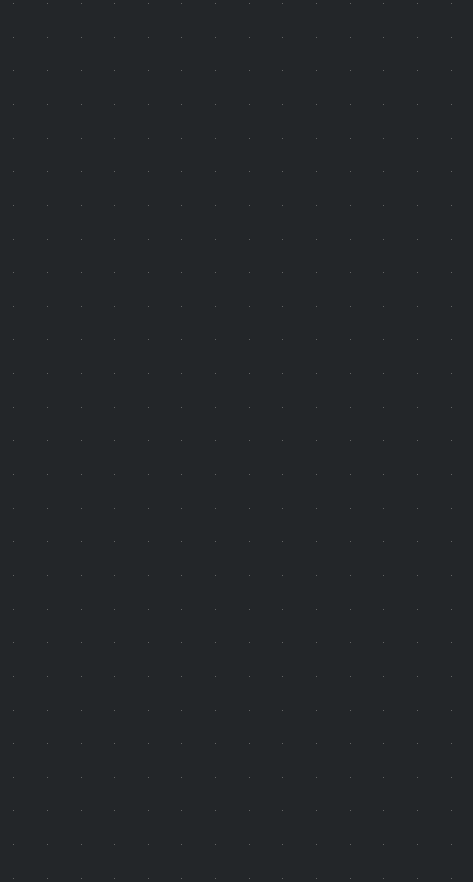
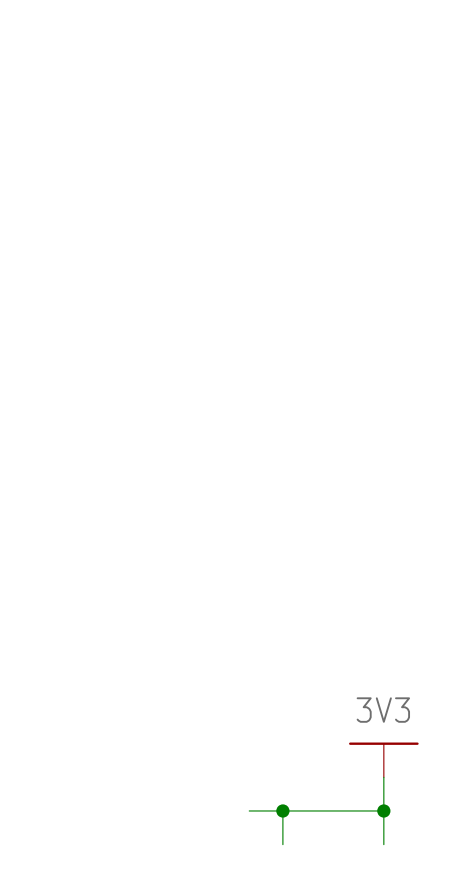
power symbol: none -> 3V3 (383, 759)
wire: none -> (383, 777) (383, 844)
wire: none -> (249, 810) (383, 810)
wire: none -> (282, 810) (282, 844)
junction: none -> (282, 810)
junction: none -> (383, 810)

